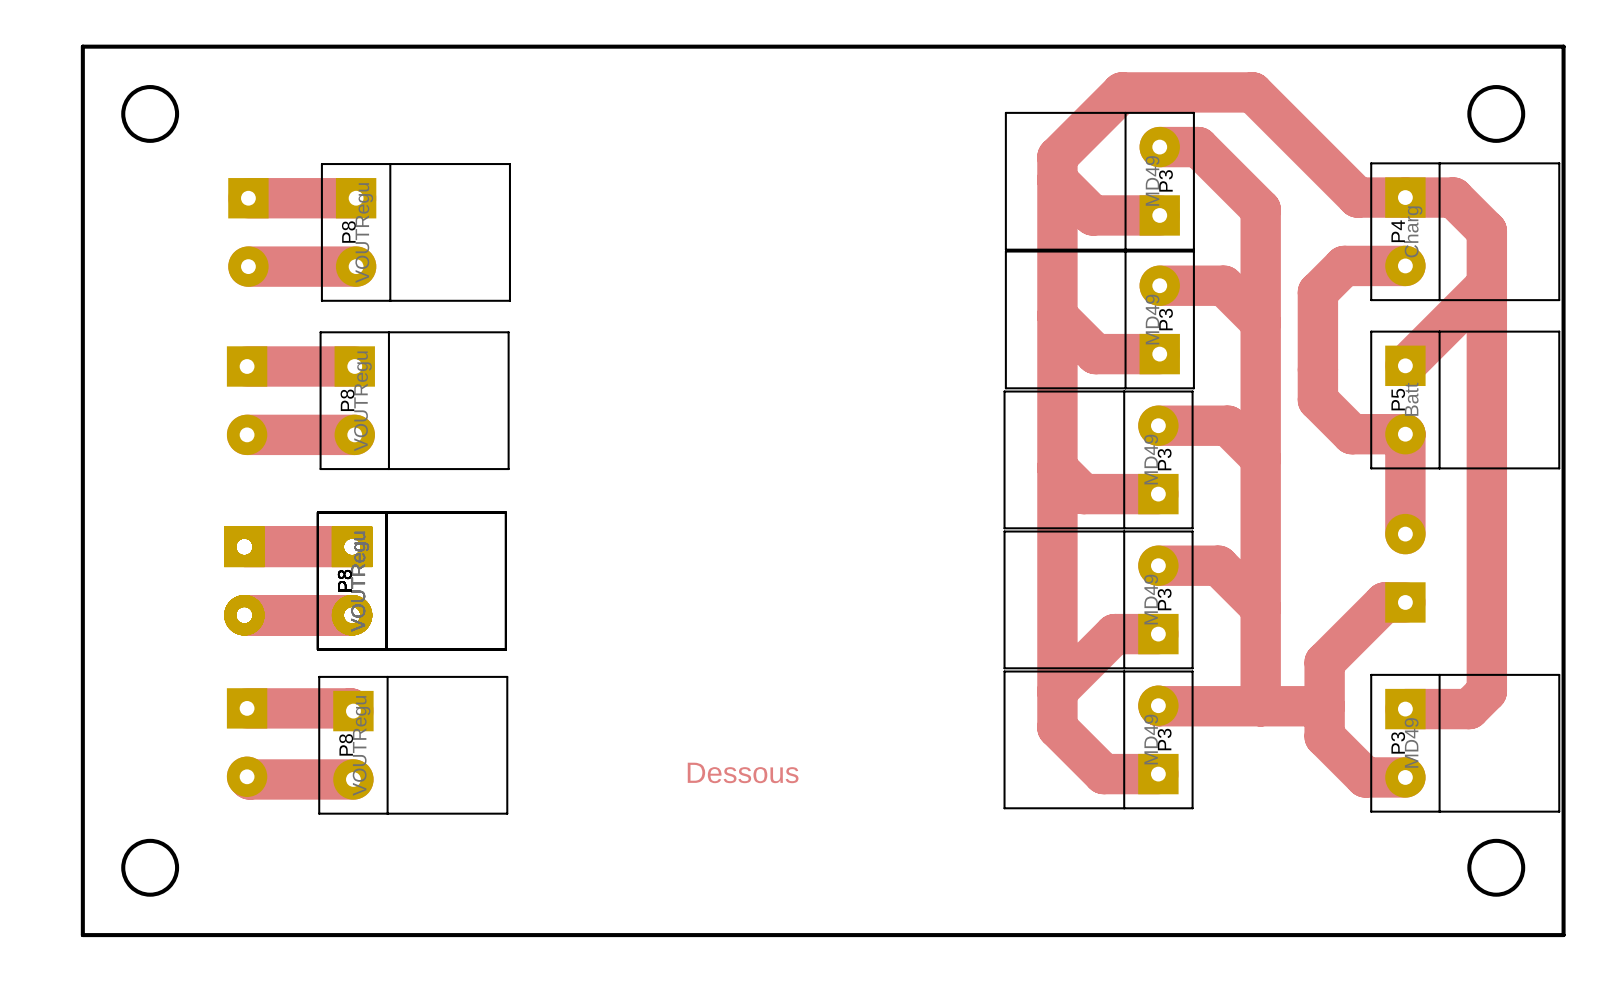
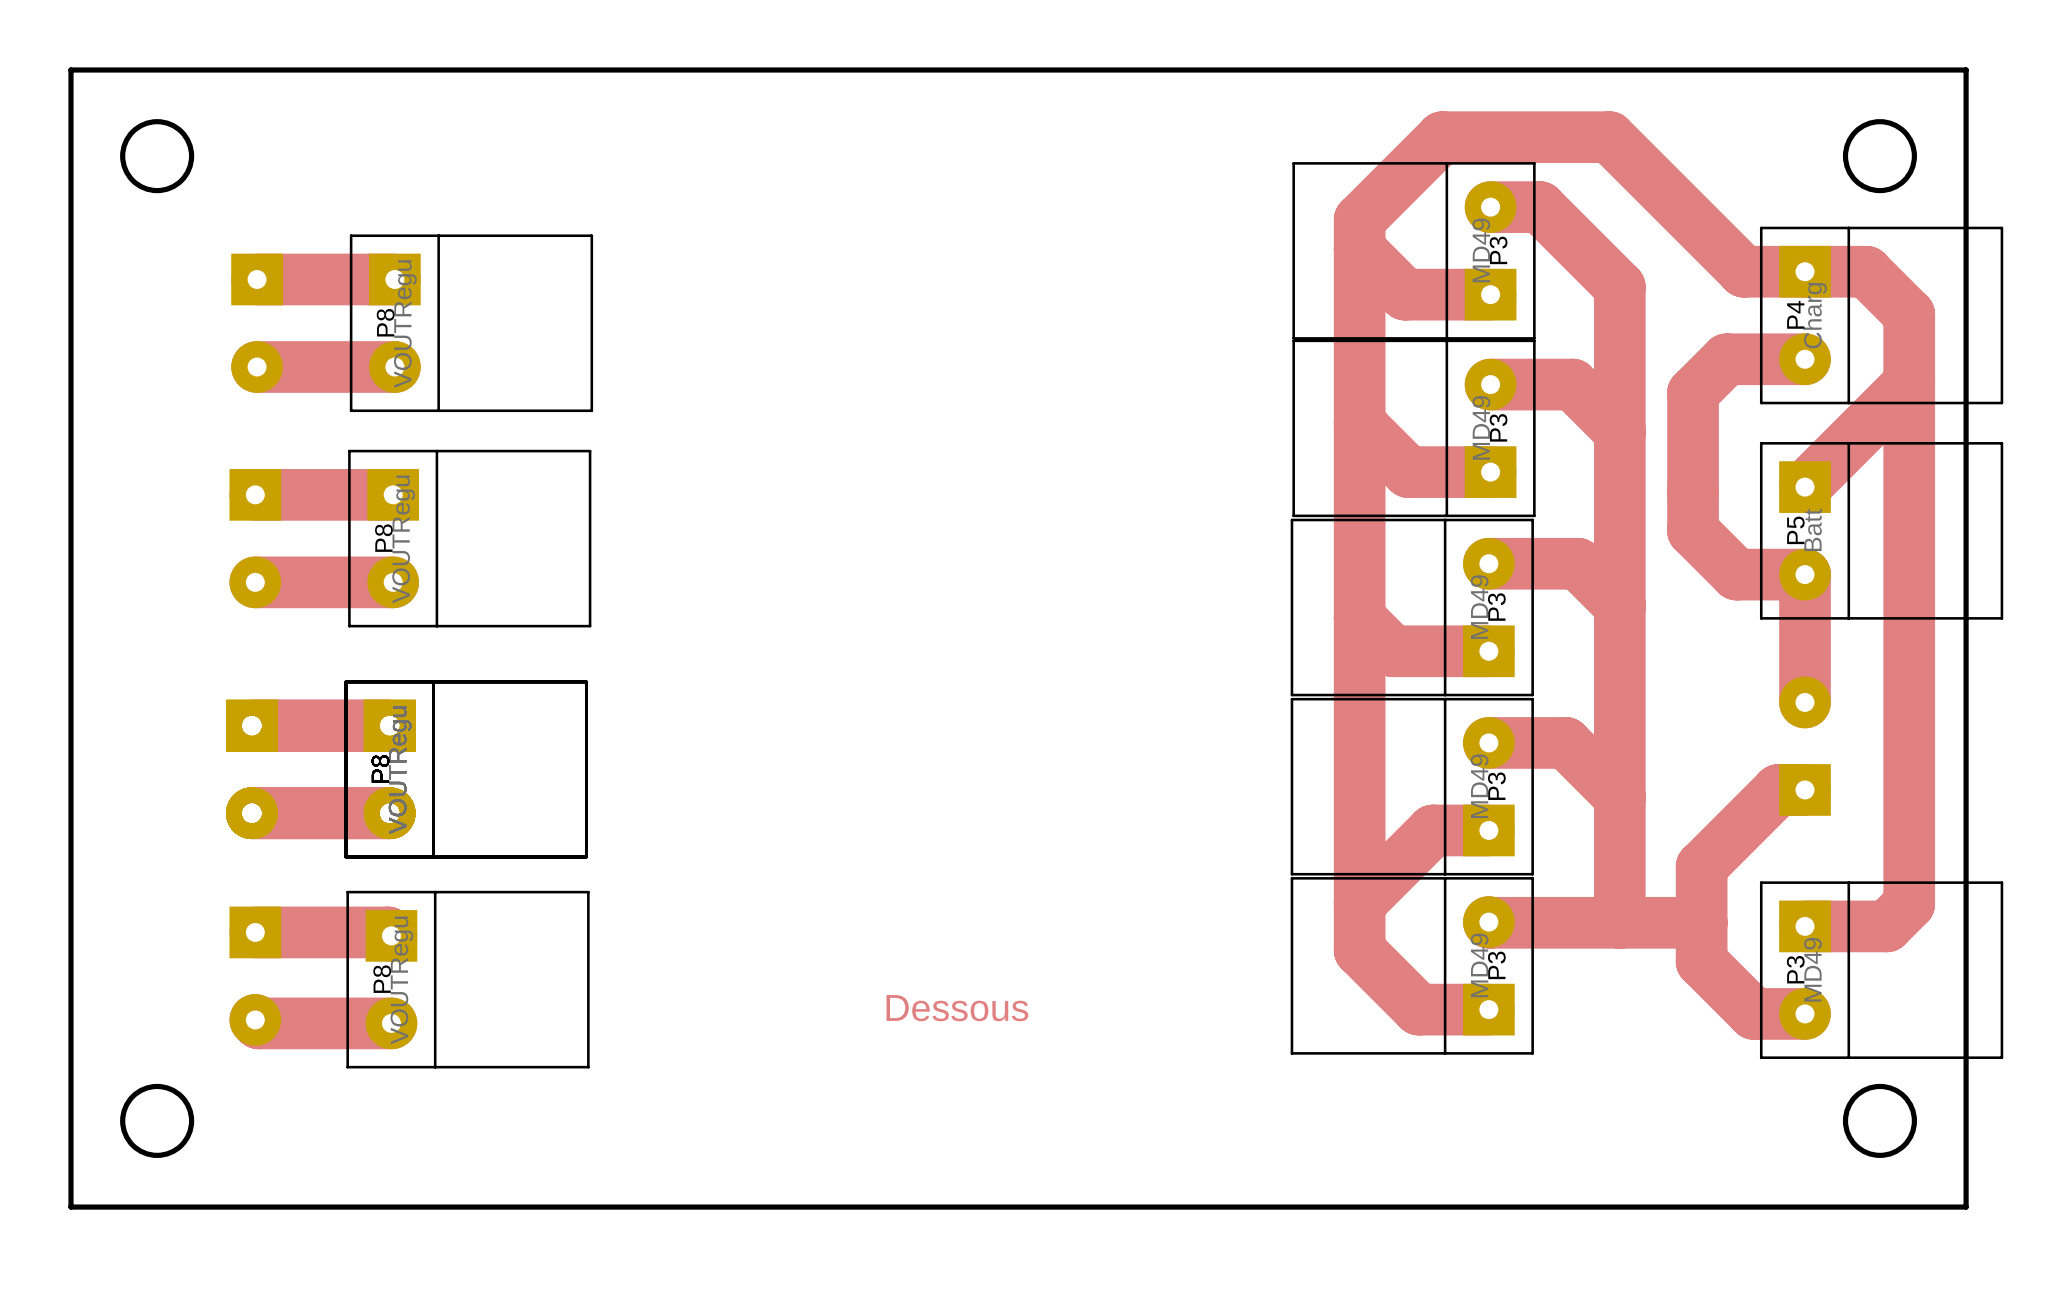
board edge: (82, 46) (1563, 46) (1563, 935) (82, 935) (82, 46) -> (70, 69) (1966, 69) (1966, 1207) (70, 1207) (70, 69)
round board edge position: (150, 113) -> (157, 156)
round board edge position: (1496, 113) -> (1879, 156)
track: (248, 198) (356, 198) -> (257, 279) (394, 279)
part position: (248, 232) -> (257, 323)
P8 position: (415, 232) -> (471, 323)
track: (248, 266) (356, 266) -> (257, 367) (394, 367)
track: (247, 366) (354, 366) -> (255, 494) (393, 494)
part position: (247, 400) -> (255, 538)
P8 position: (414, 400) -> (469, 538)
track: (247, 434) (354, 434) -> (255, 582) (393, 582)
track: (244, 546) (352, 546) -> (251, 725) (389, 725)
part position: (244, 581) -> (251, 769)
P8 position: (411, 581) -> (466, 769)
track: (244, 615) (352, 615) -> (251, 813) (389, 813)
track: (247, 708) (350, 708) (353, 711) -> (255, 932) (387, 932) (391, 935)
part position: (247, 742) -> (255, 976)
P8 position: (413, 745) -> (468, 979)
track: (247, 776) (249, 779) (353, 779) -> (255, 1019) (258, 1023) (391, 1023)
round board edge position: (150, 867) -> (157, 1120)
round board edge position: (1496, 867) -> (1879, 1120)

